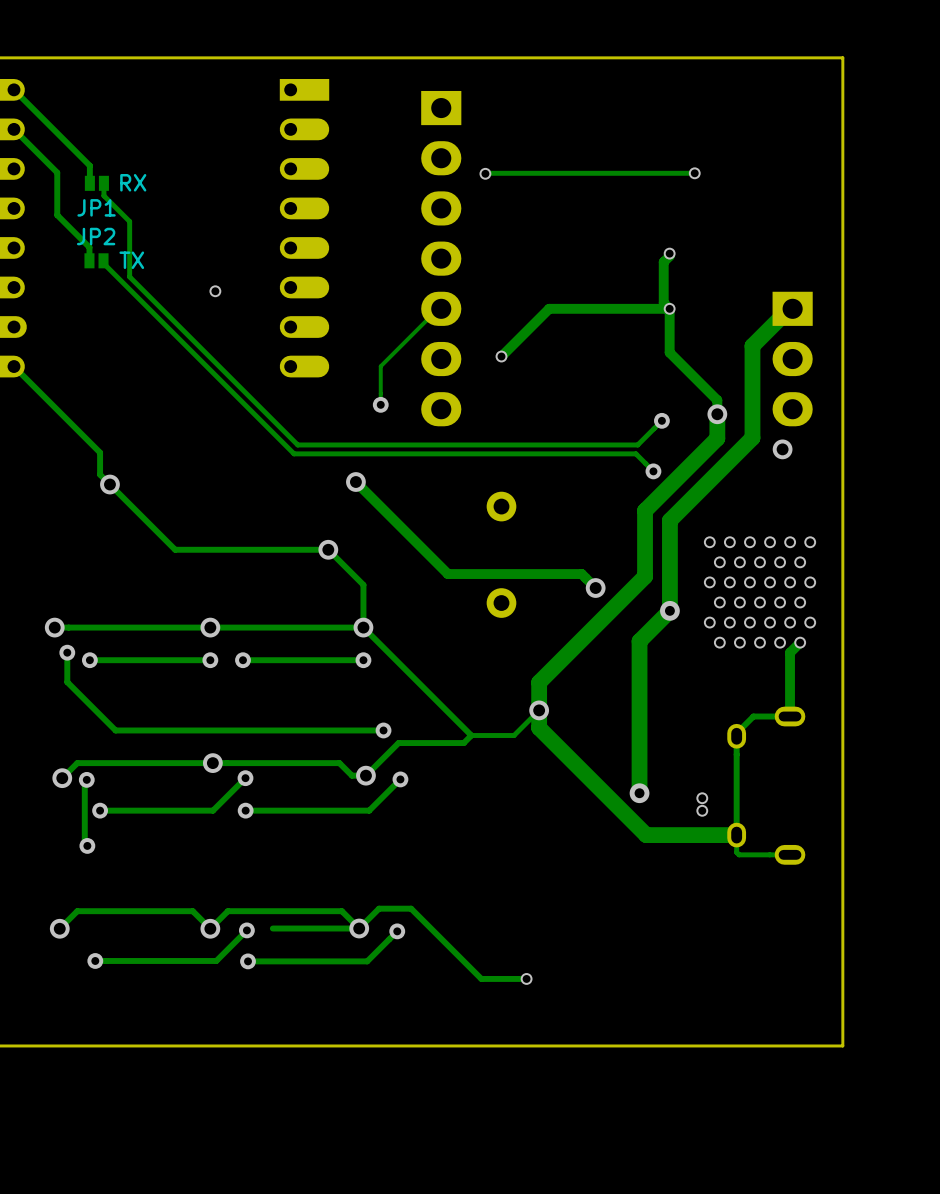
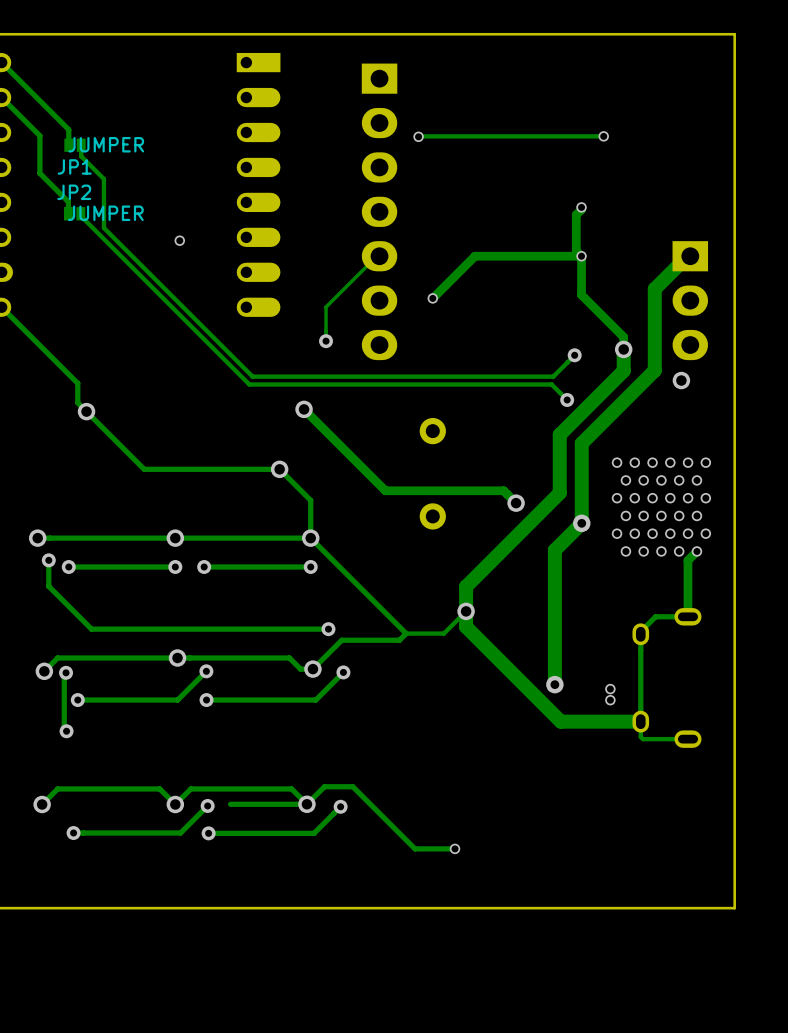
JP1 value: RX (133, 182) -> JUMPER (106, 144)
JP2 value: TX (131, 260) -> JUMPER (105, 213)

